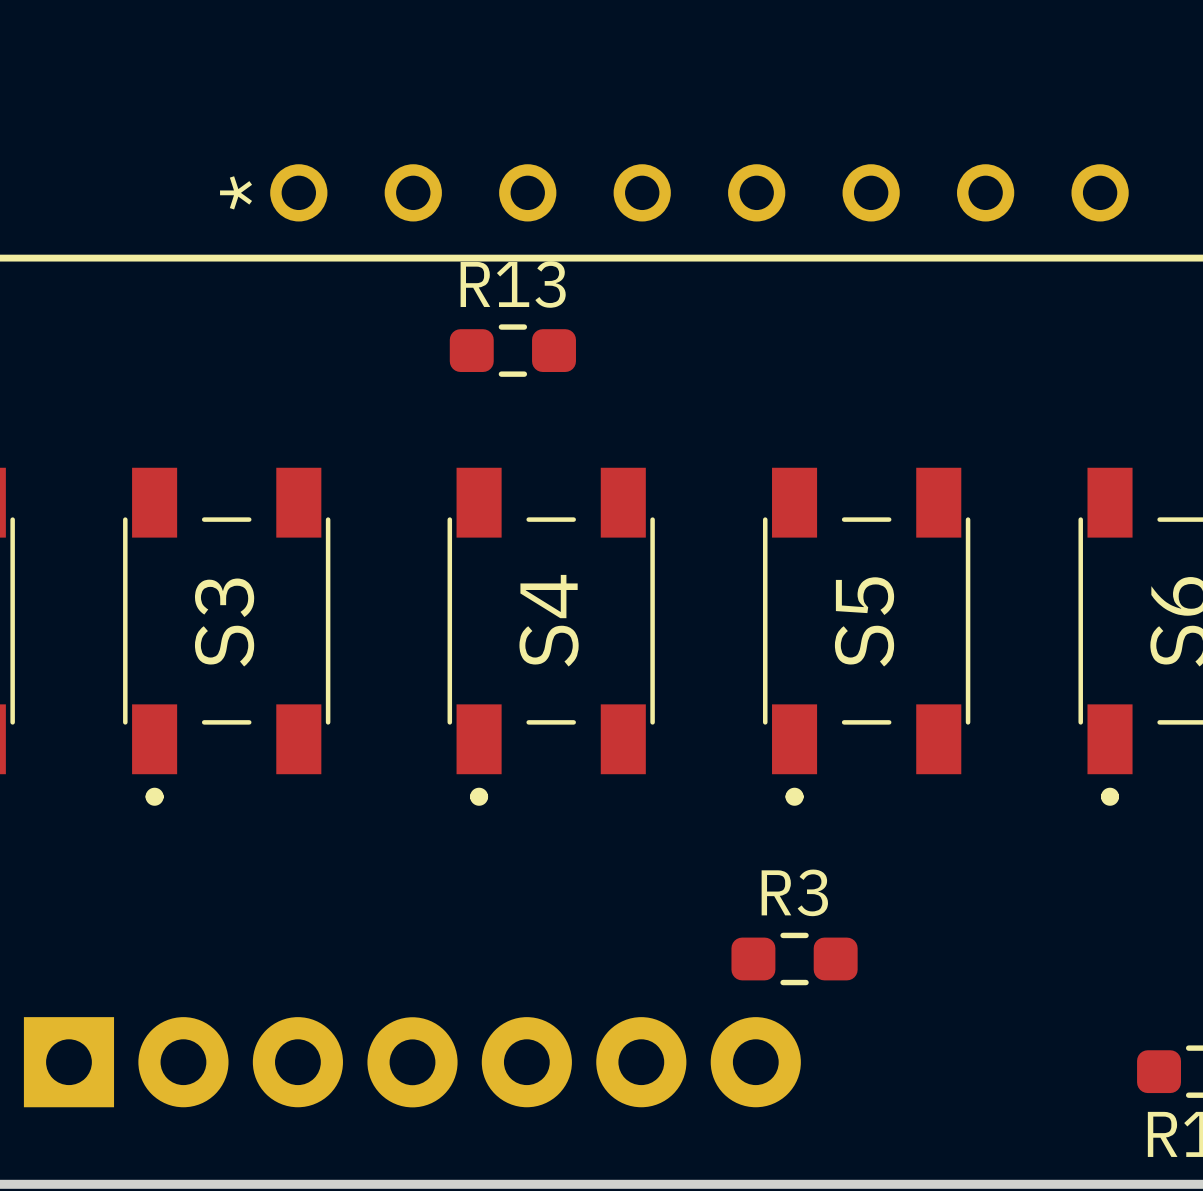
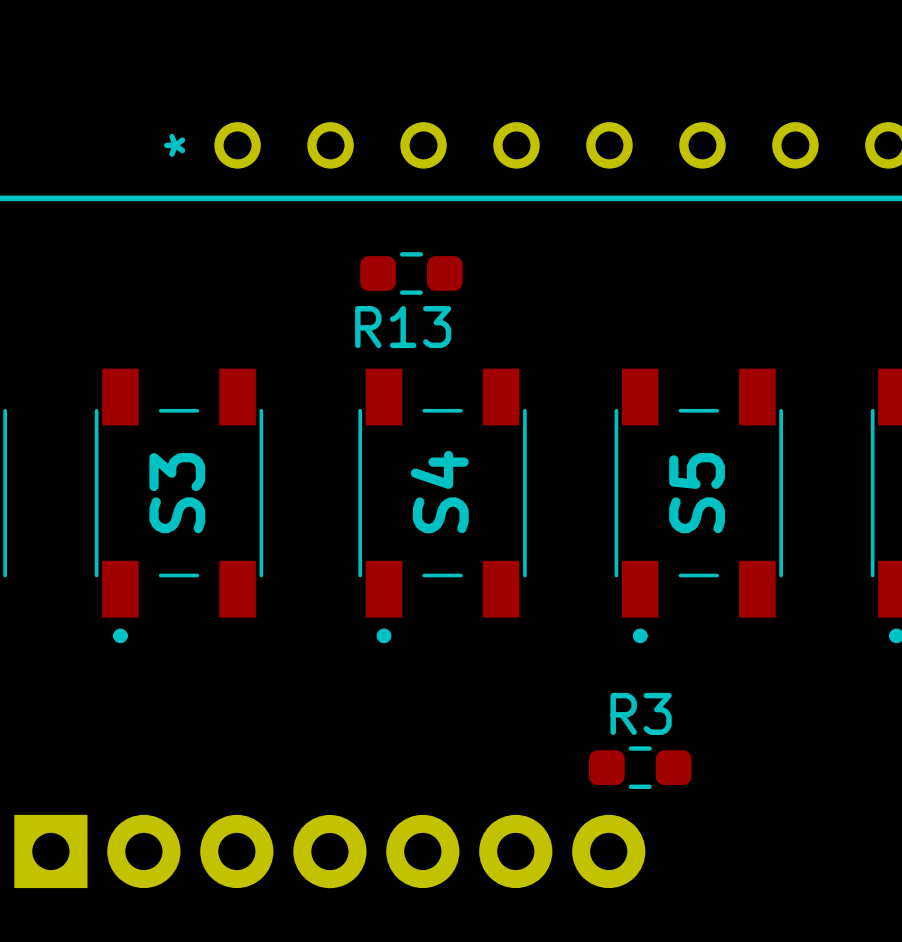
R13 name position: R13 (513, 284) -> R13 (403, 327)

